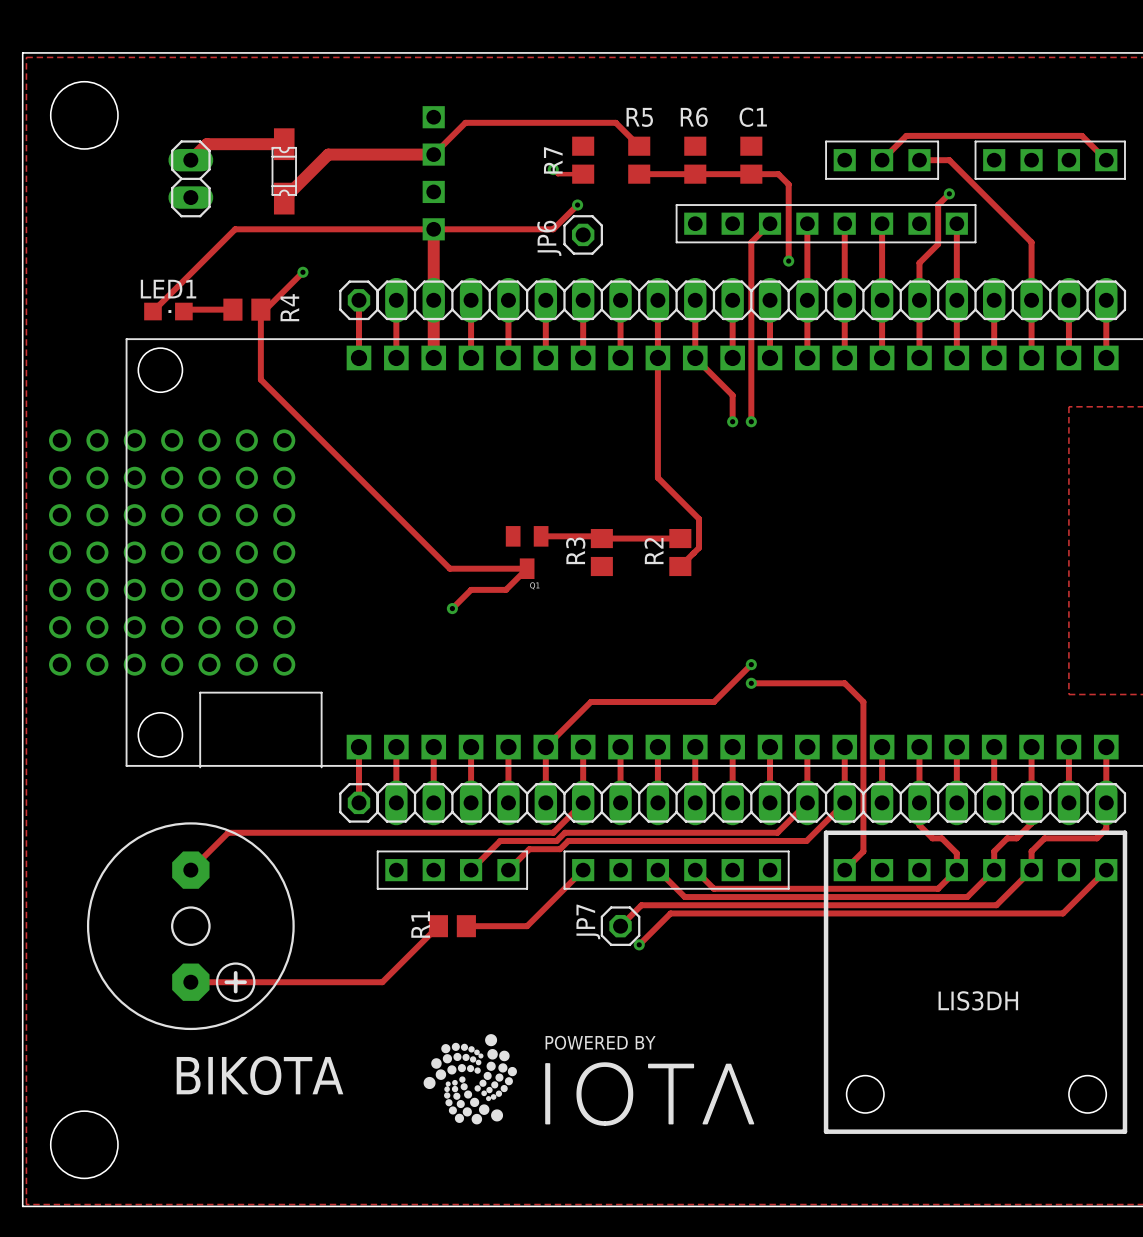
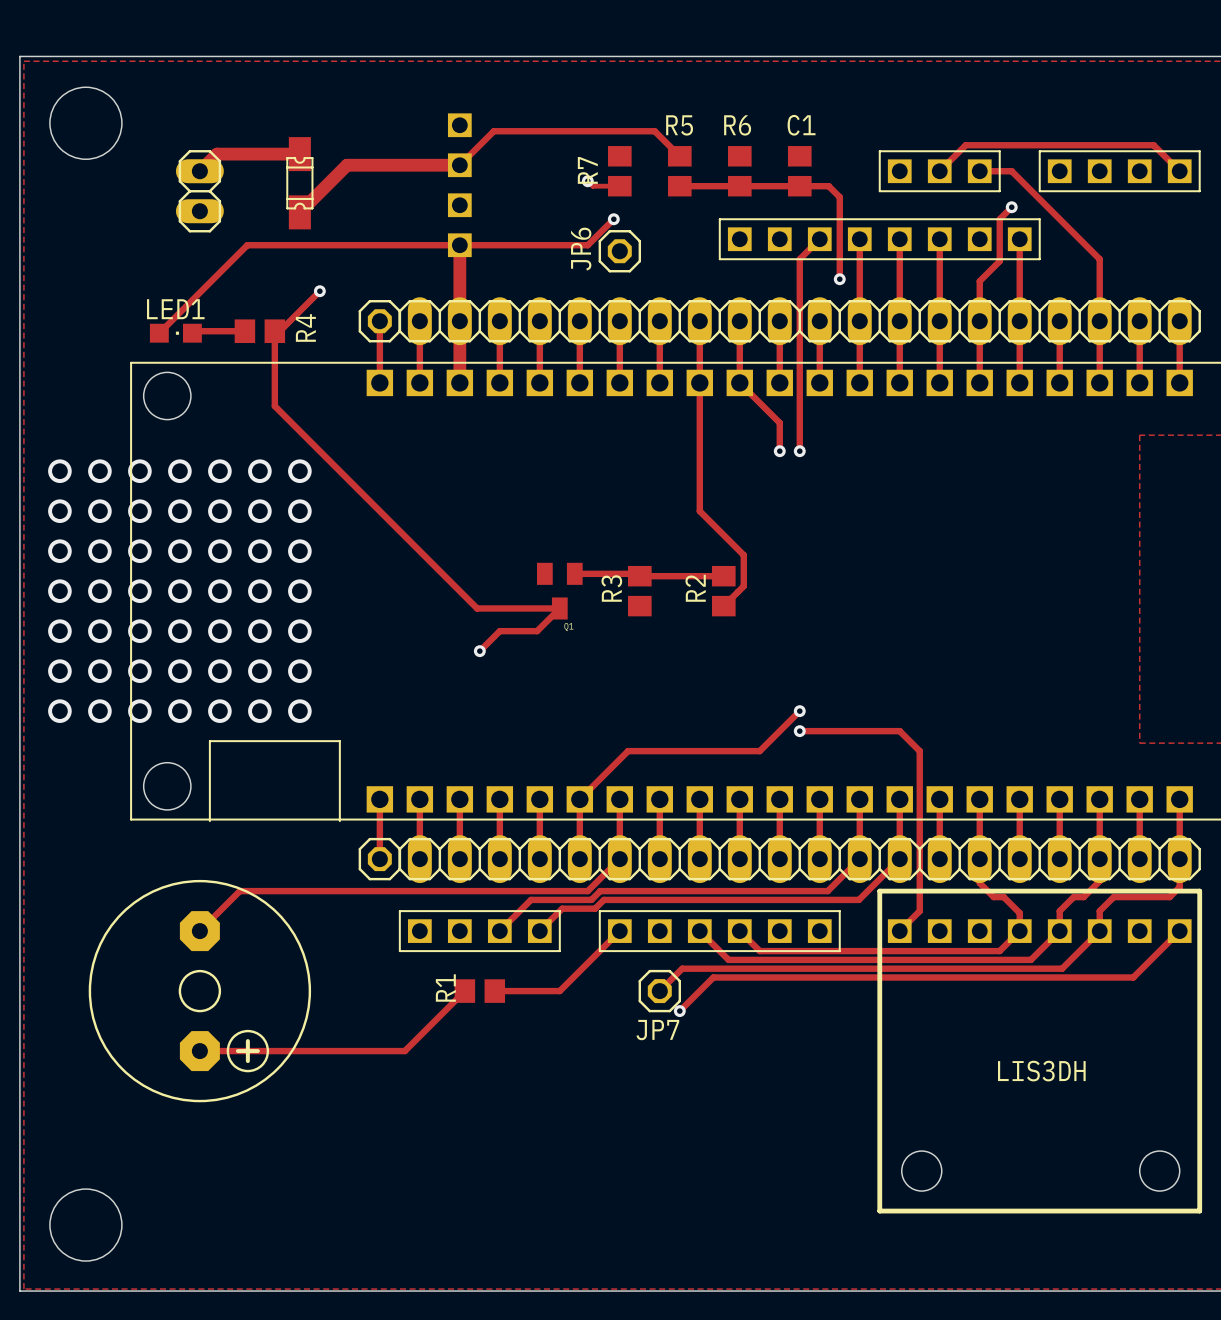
JP7 name rotation: 0° (588, 921) -> 90° clockwise (657, 1030)
drawing: [423, 1034, 517, 1125] -> none
text: POWERED BY (600, 1042) -> none
drawing: [576, 1062, 755, 1126] -> none
drawing: [545, 1063, 551, 1125] -> none
text: BIKOTA (260, 1075) -> none

